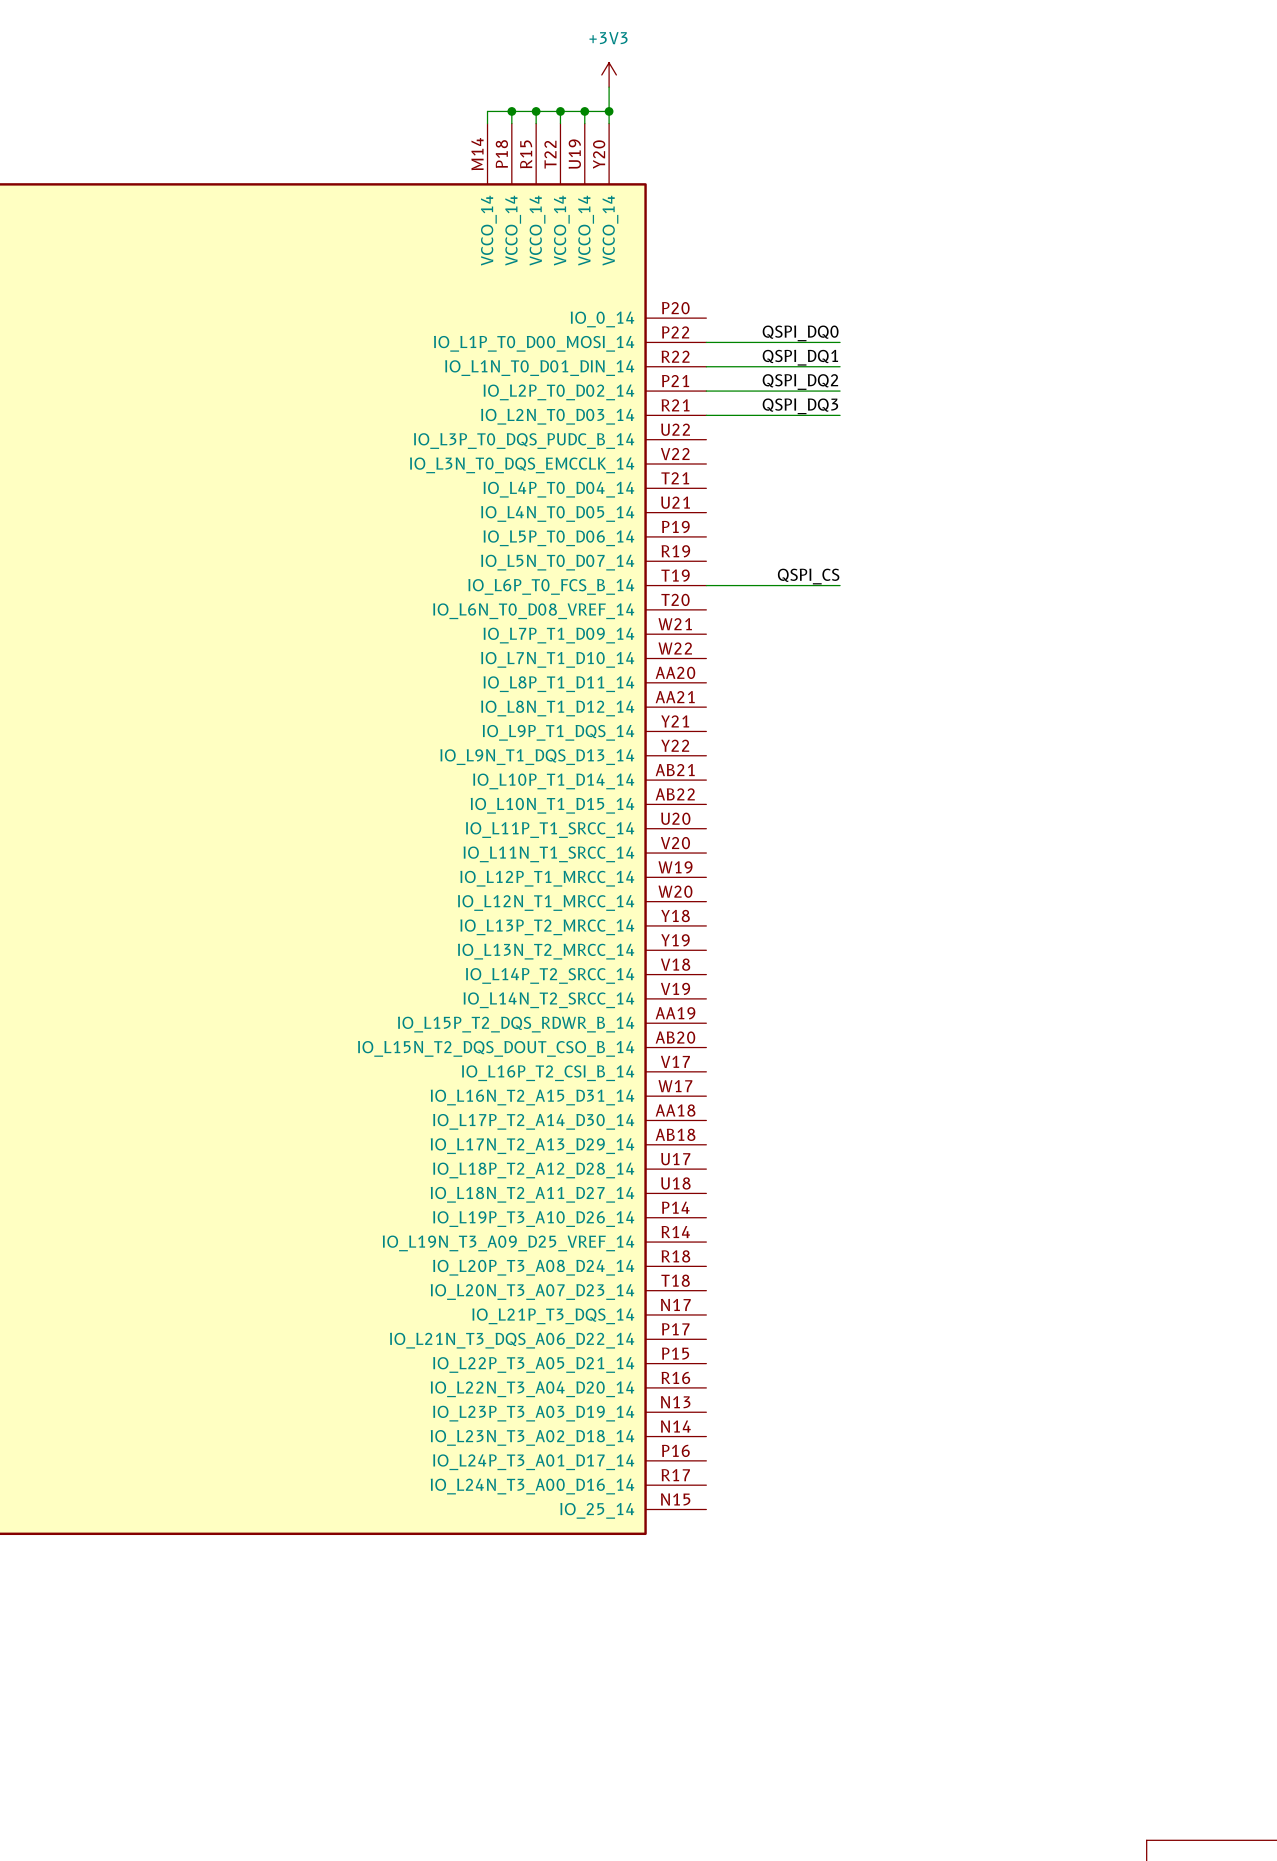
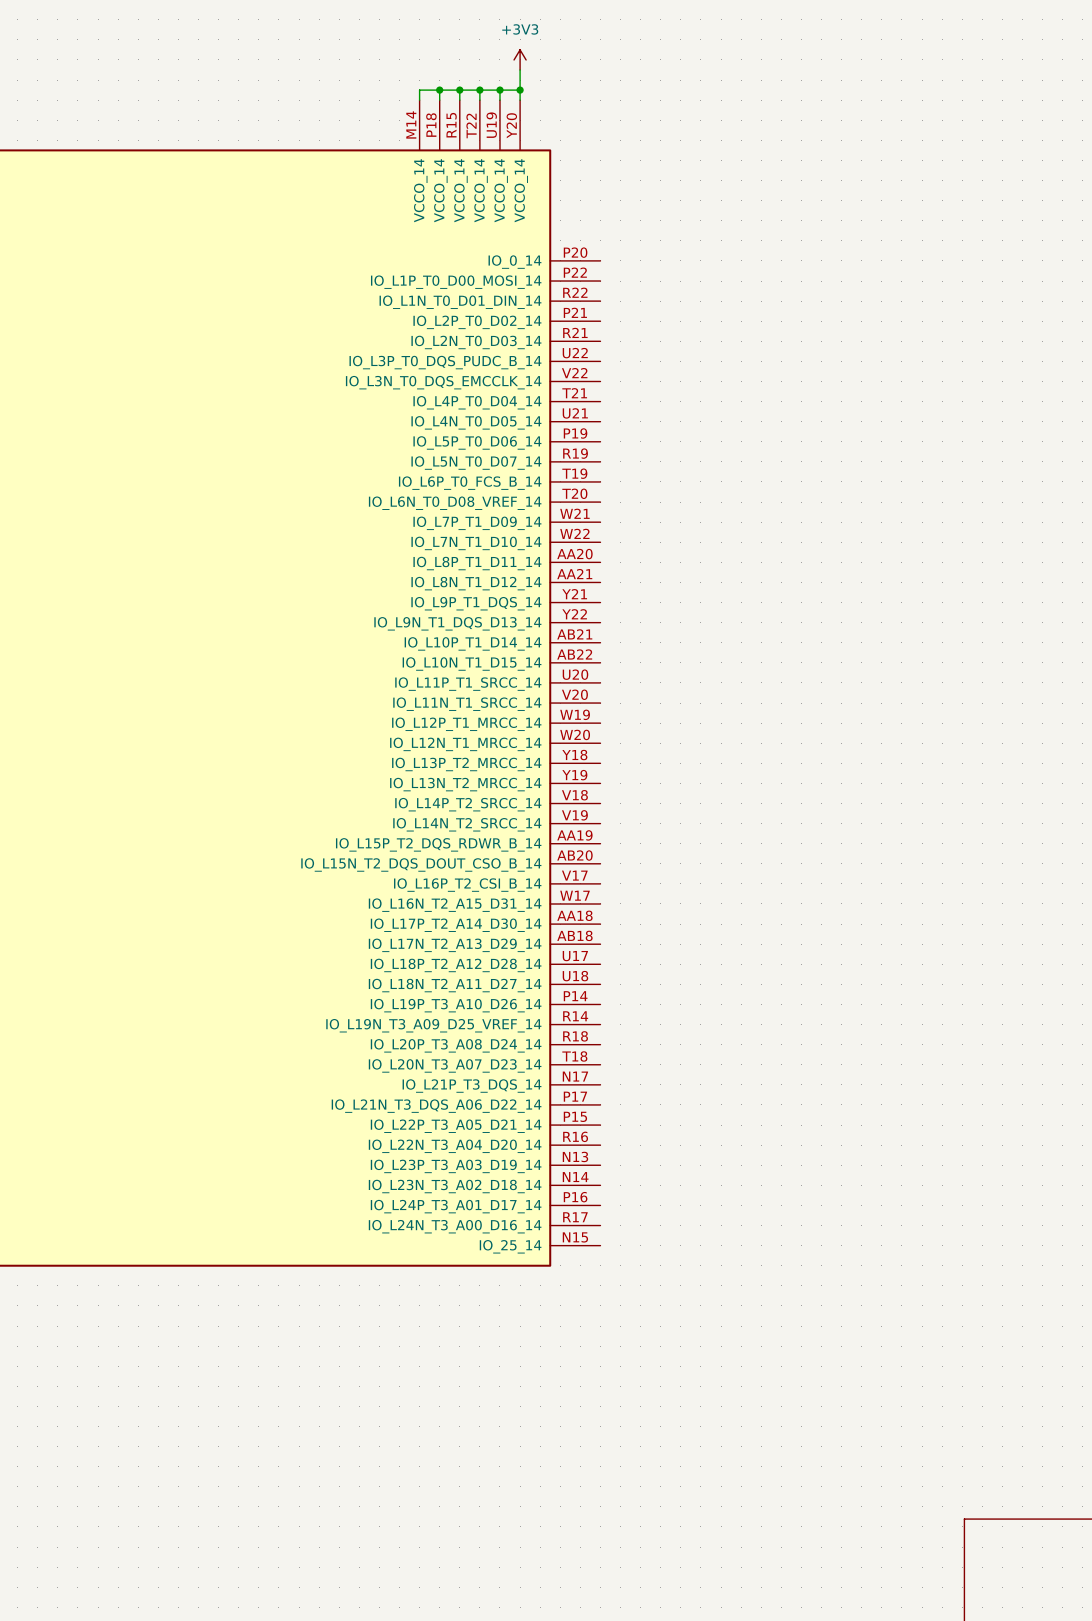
label: QSPI_DQ0 (800, 333) -> none
wire: (706, 342) (840, 342) -> none
label: QSPI_DQ1 (800, 357) -> none
wire: (706, 366) (840, 366) -> none
label: QSPI_DQ2 (800, 382) -> none
wire: (706, 391) (840, 391) -> none
label: QSPI_DQ3 (800, 406) -> none
wire: (706, 415) (840, 415) -> none
label: QSPI_CS (808, 576) -> none
wire: (706, 585) (840, 585) -> none

